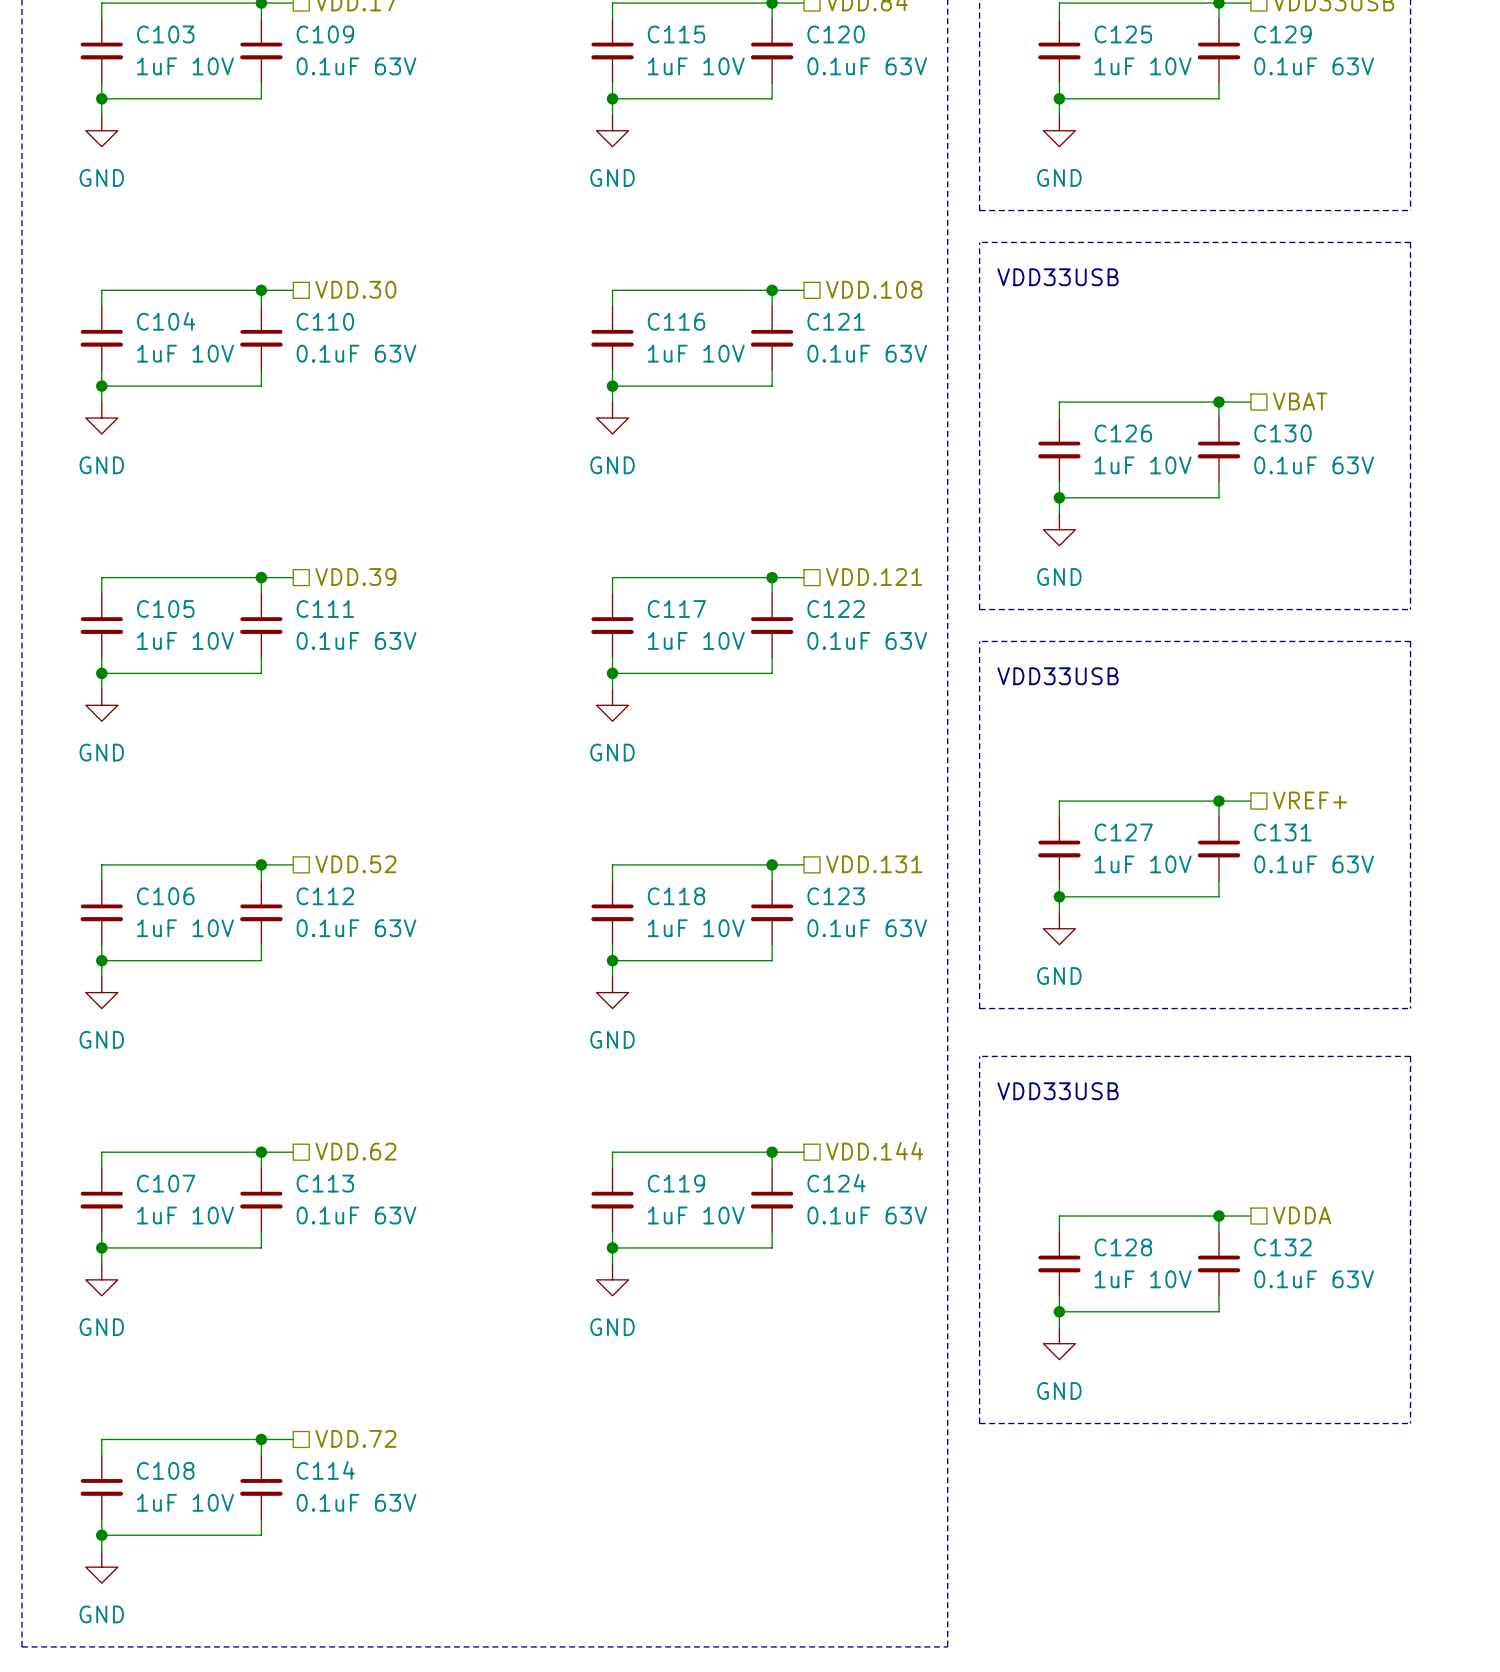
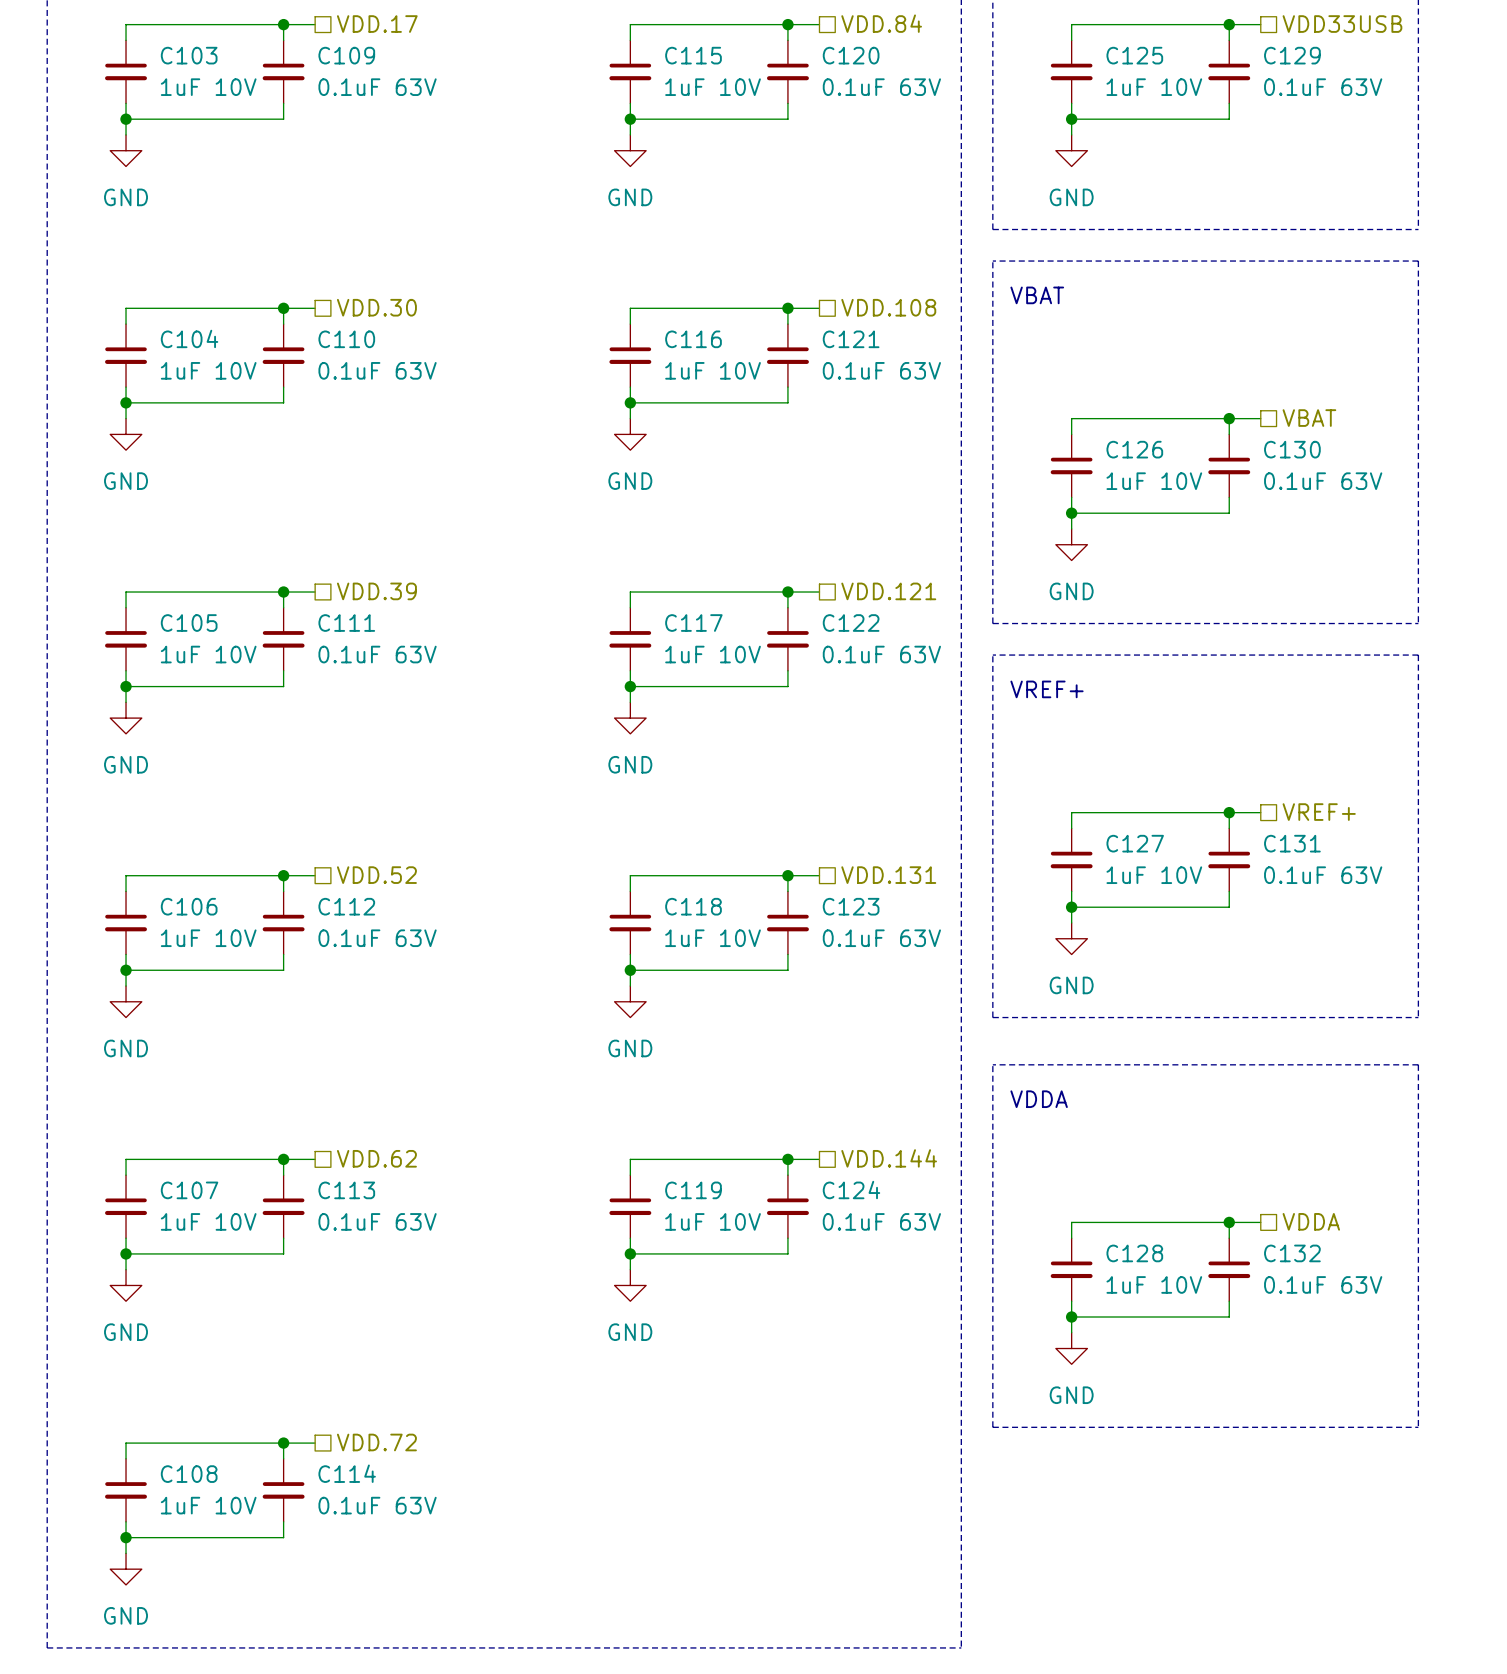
text: VDD33USB (1058, 277) -> VBAT (1037, 295)
text: VDD33USB (1058, 676) -> VREF+ (1047, 689)
text: VDD33USB (1058, 1091) -> VDDA (1039, 1099)

